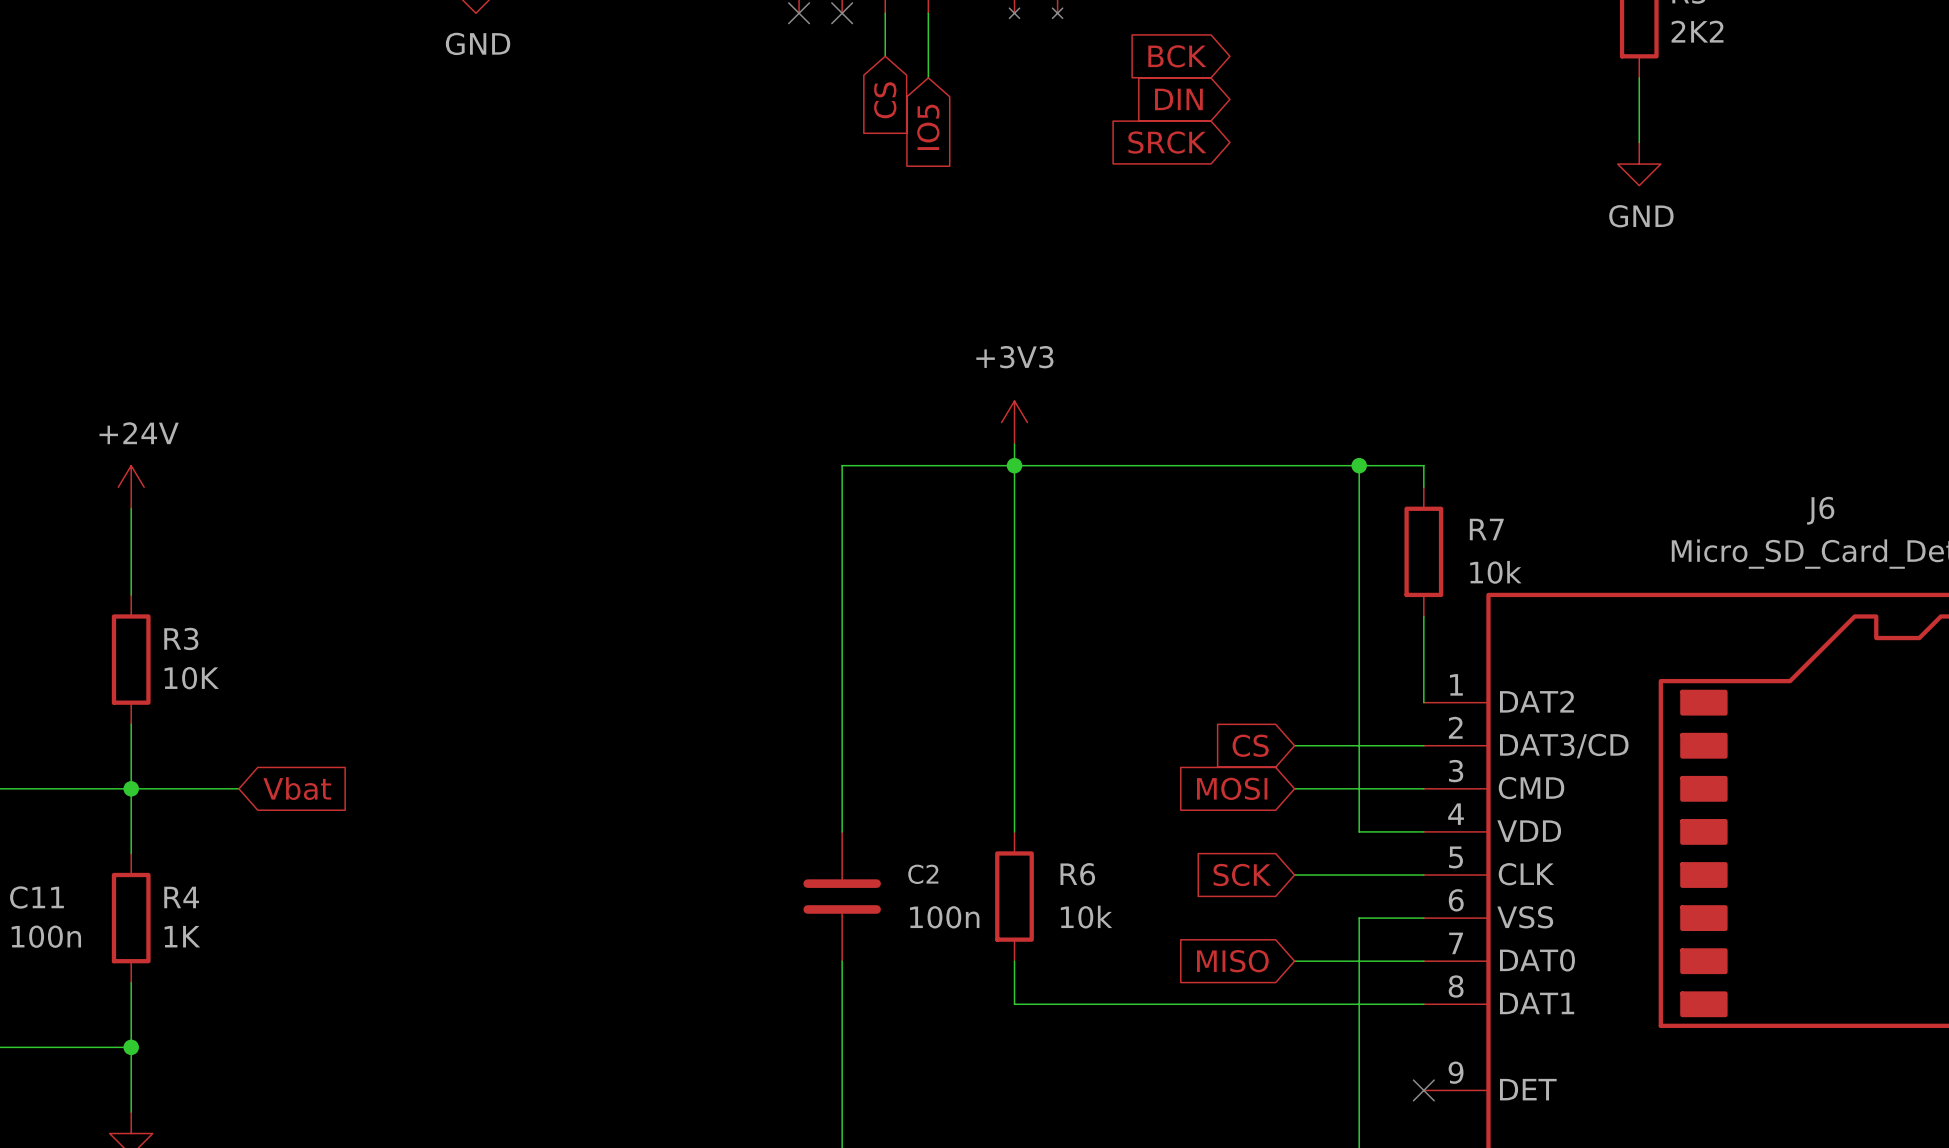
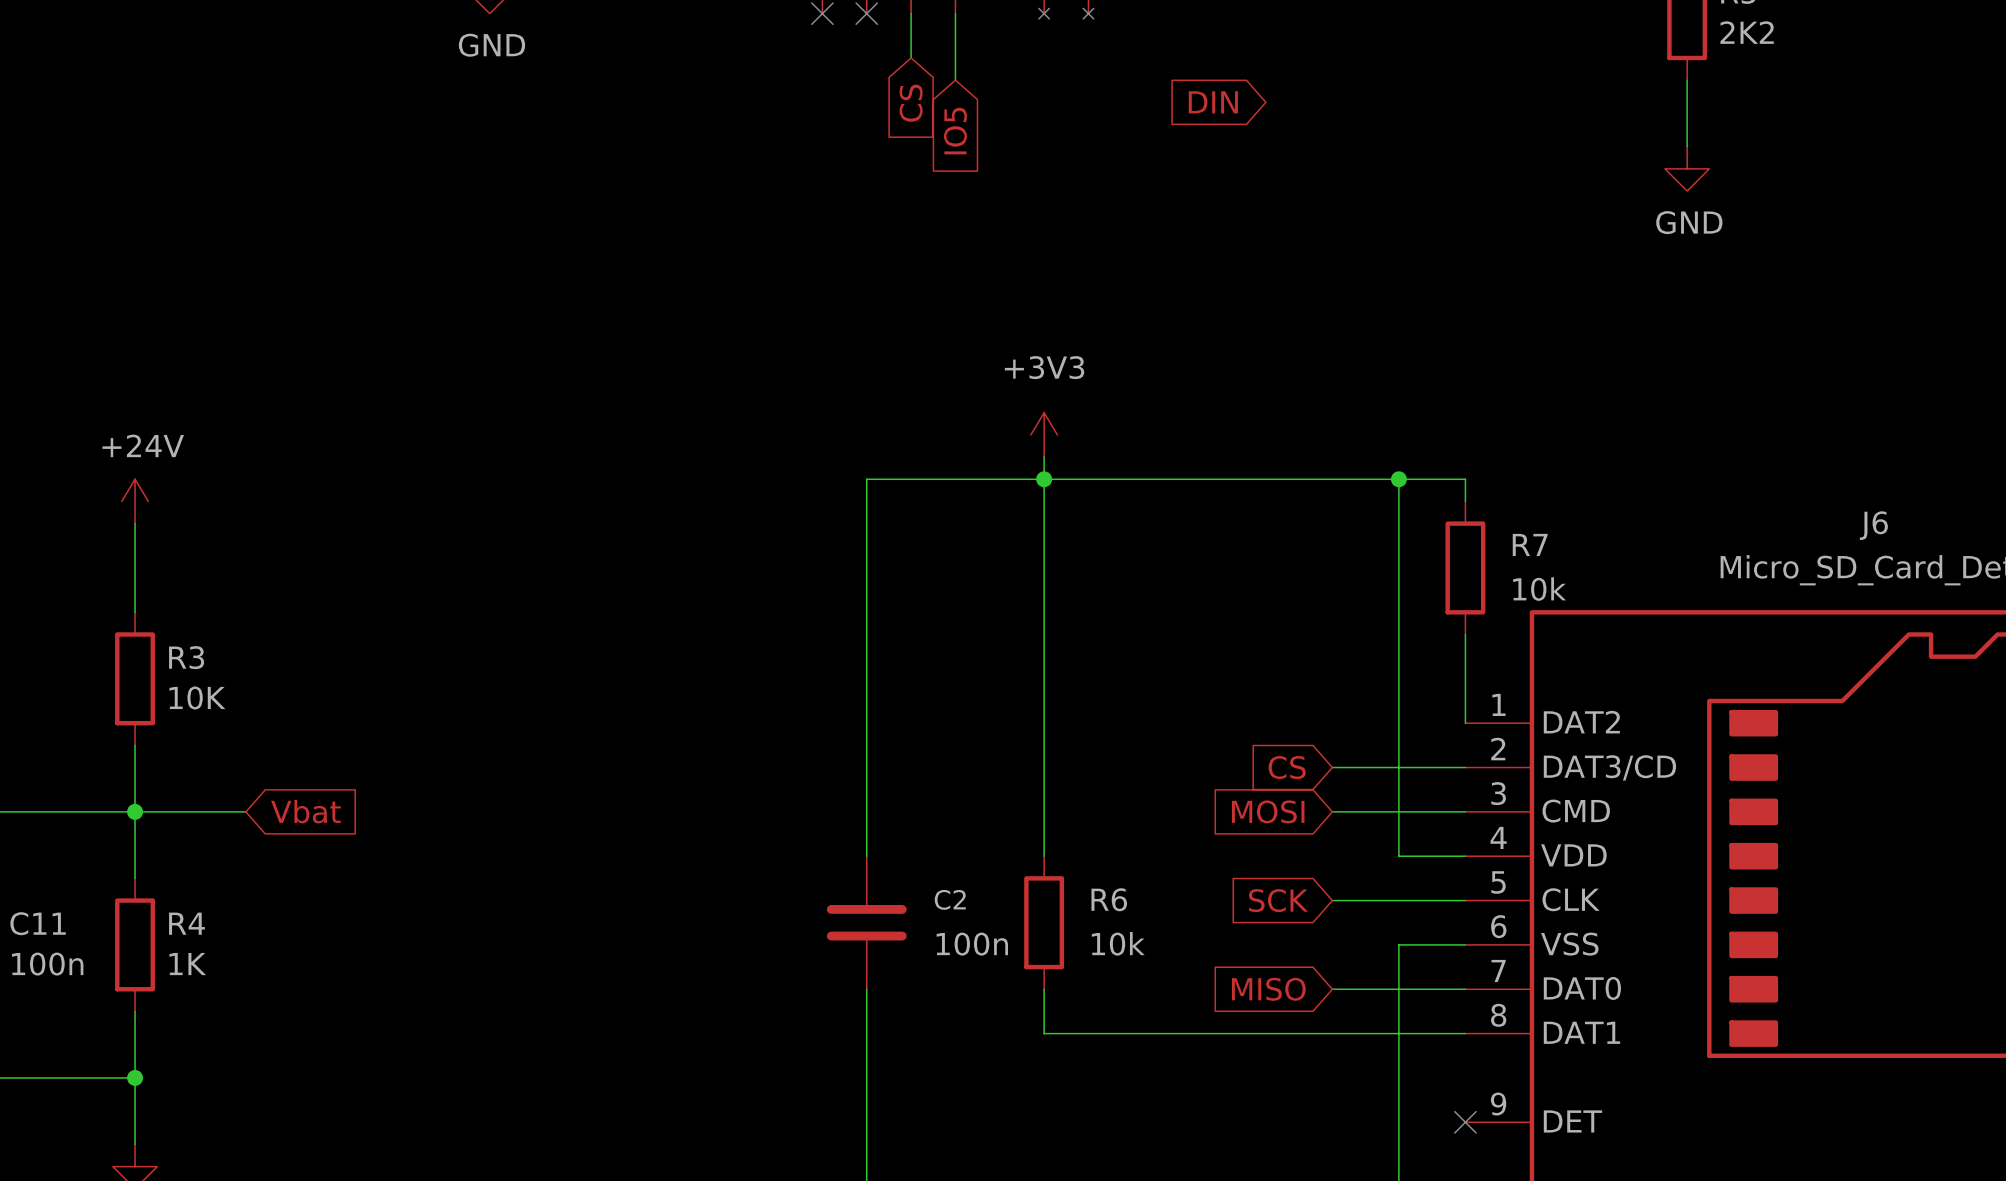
global label: BCK (1177, 56) -> none
global label: SRCK (1167, 142) -> none

